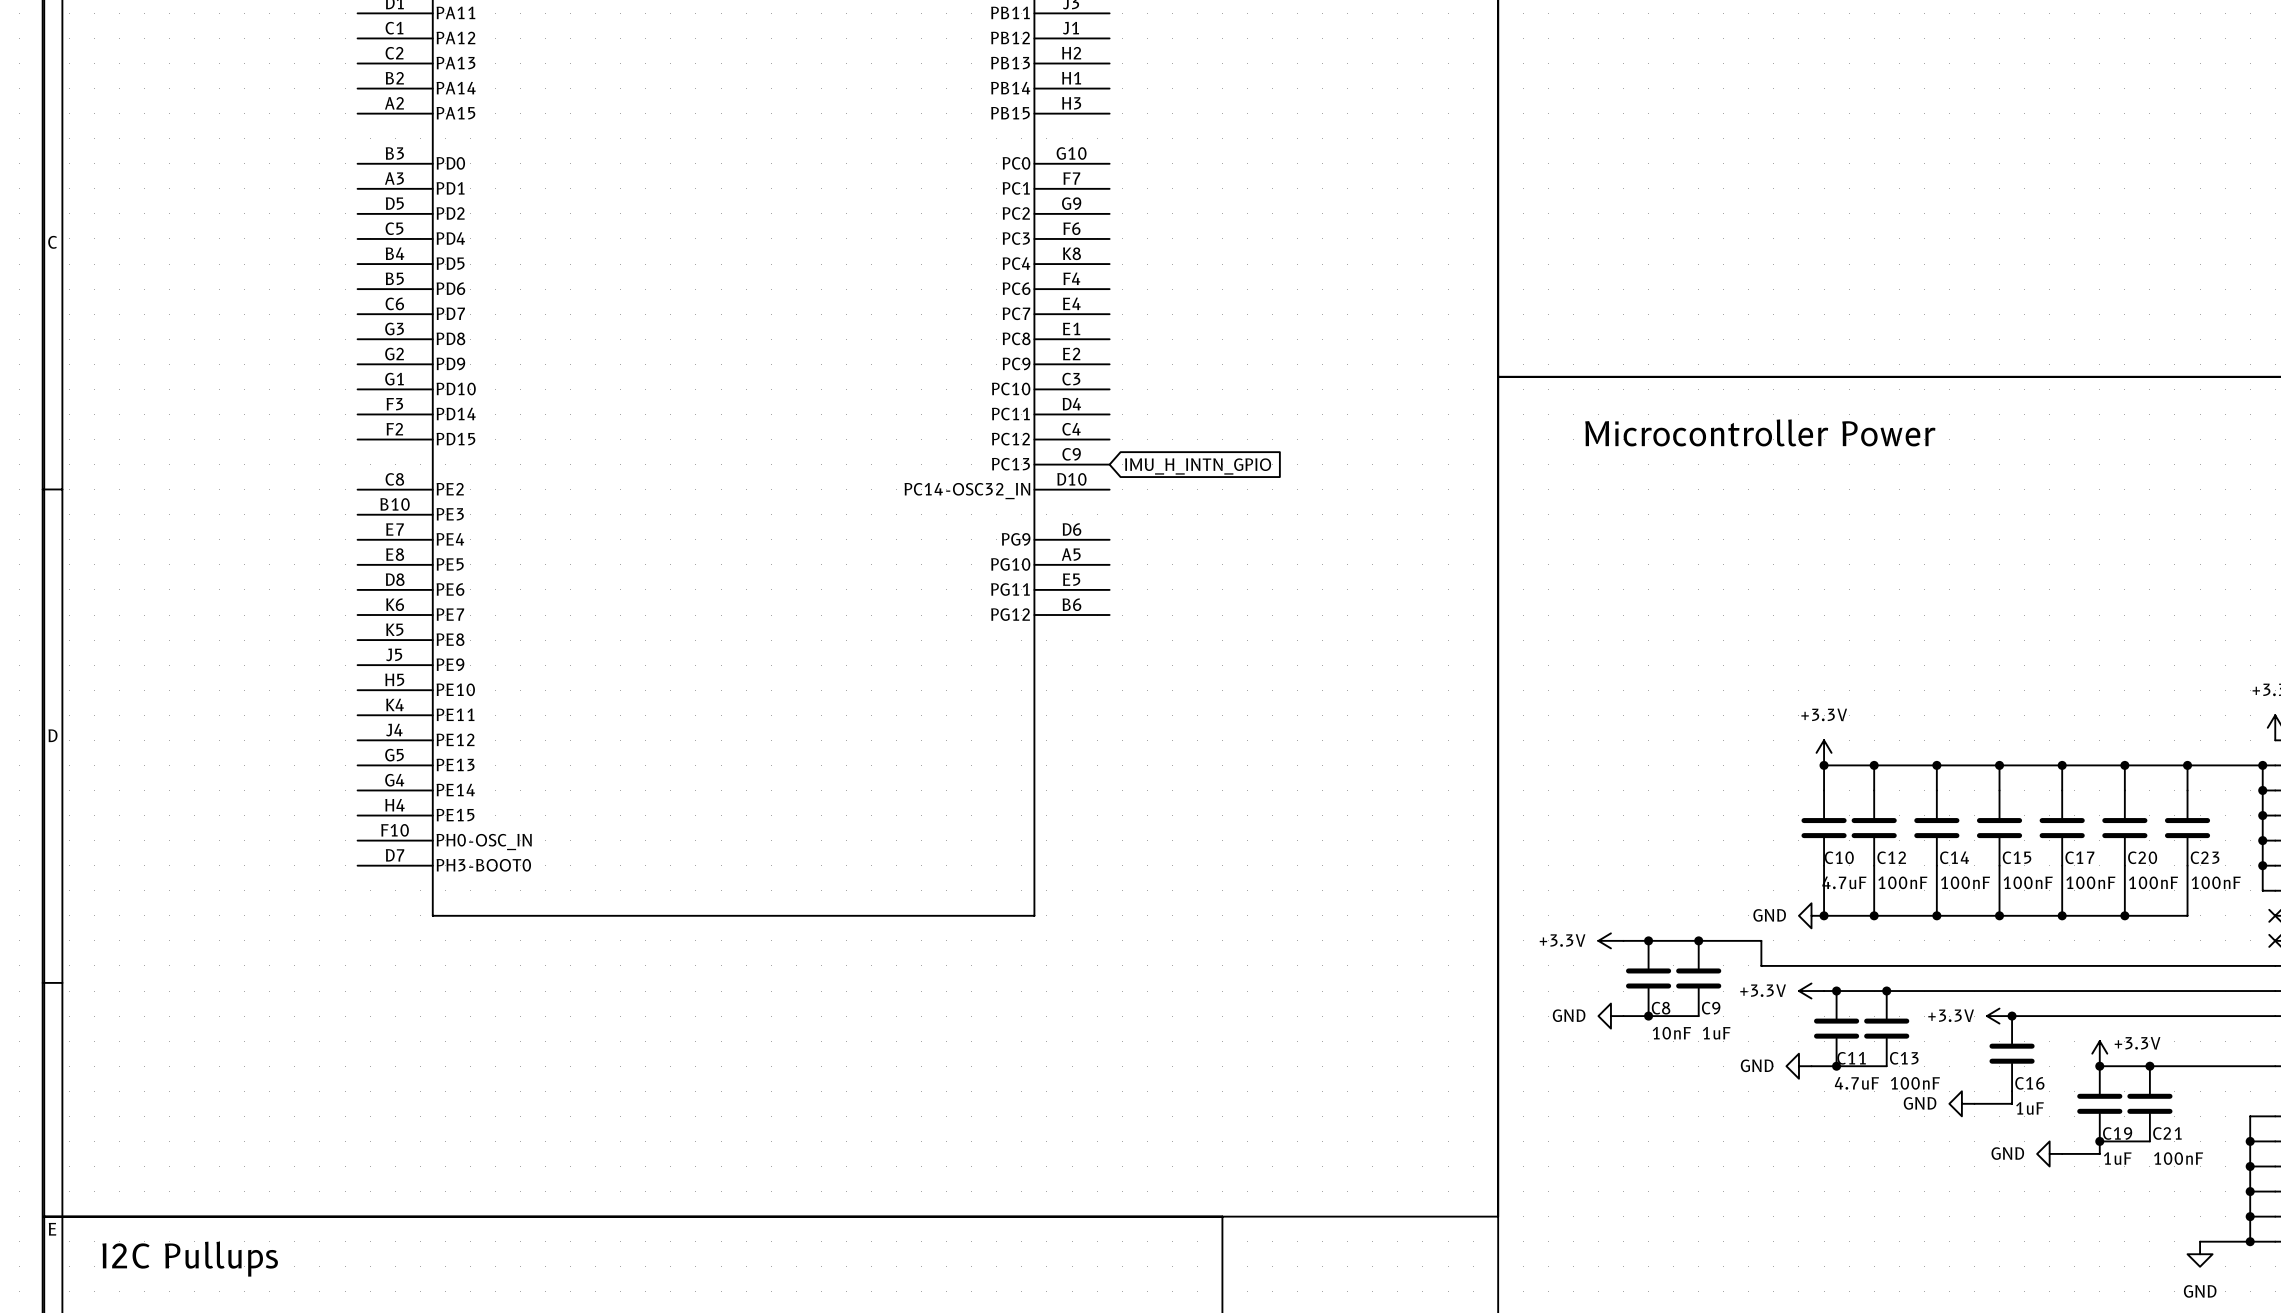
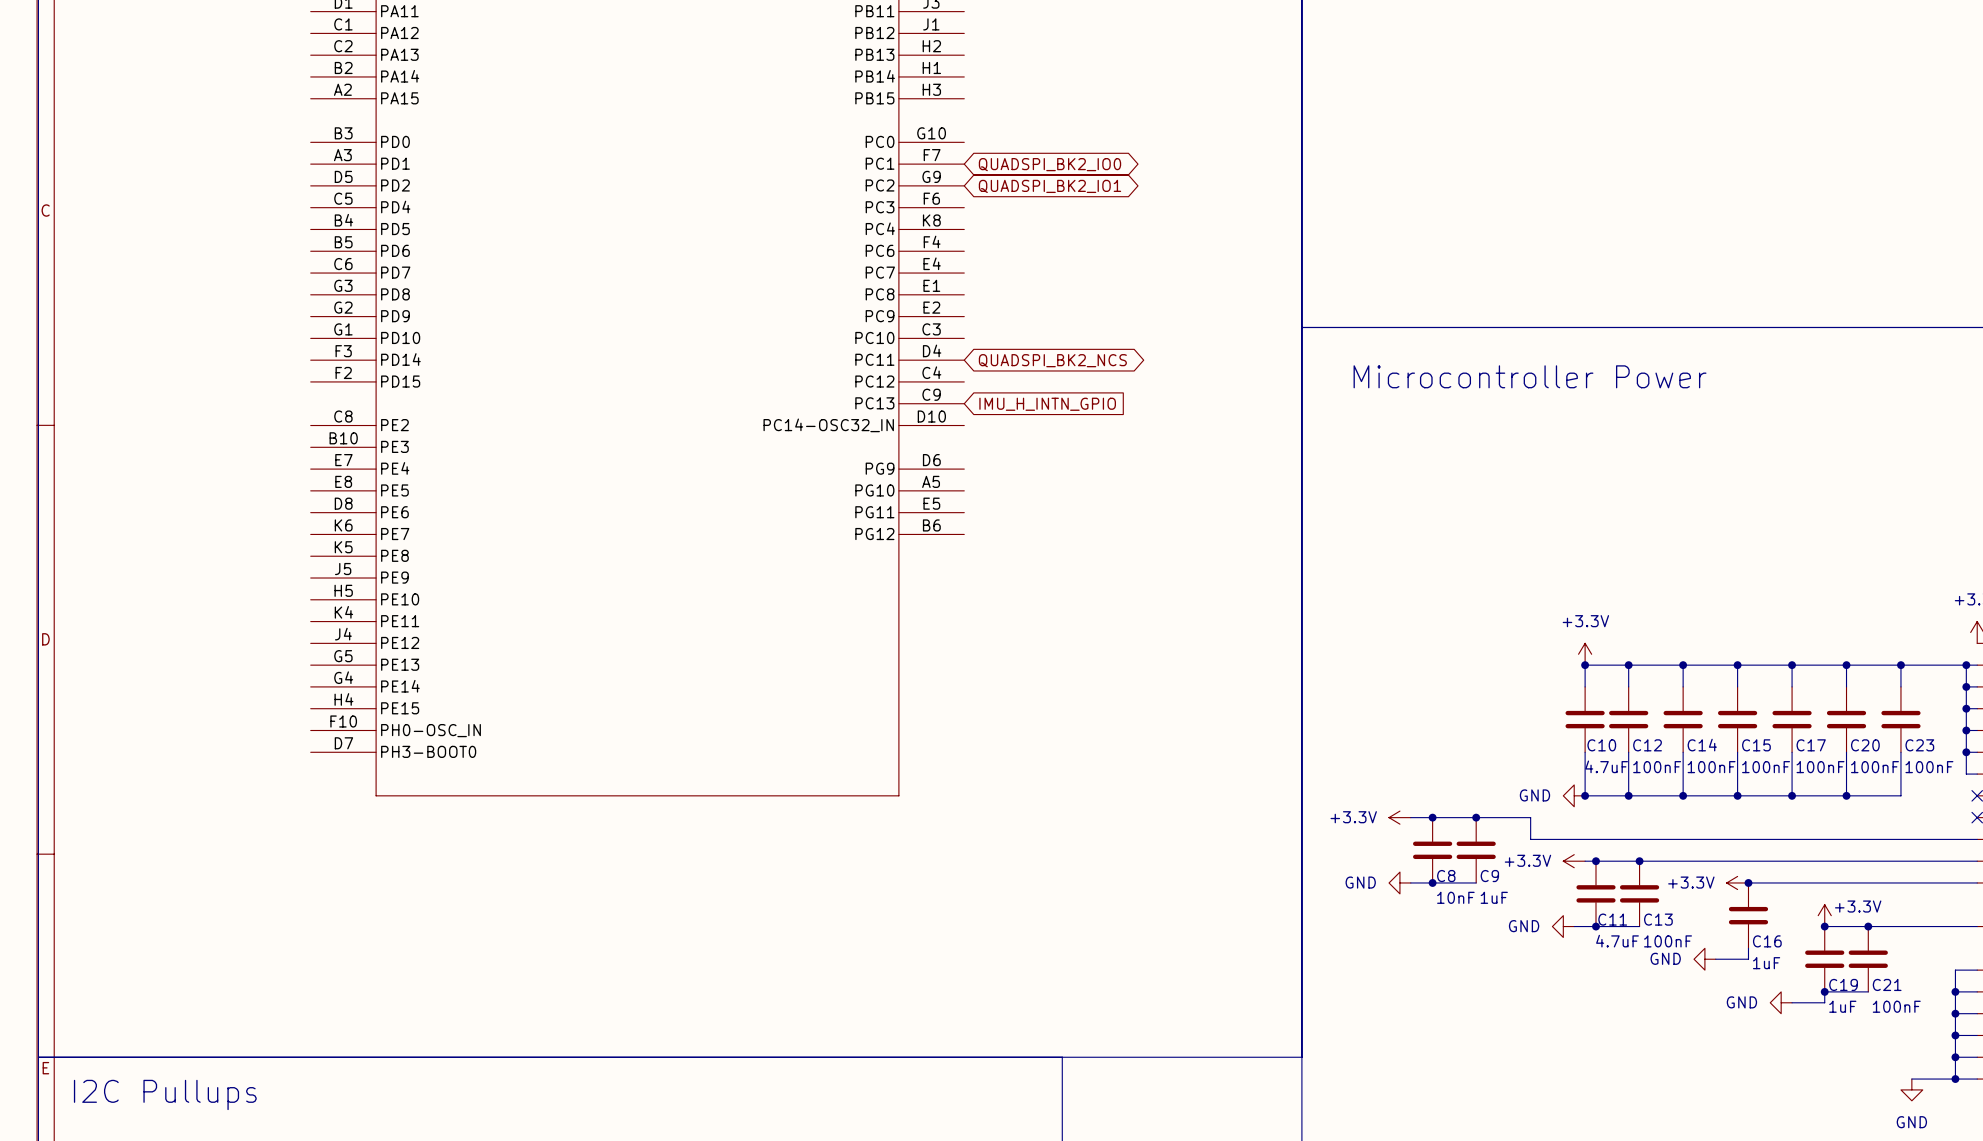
global label: none -> QUADSPI_BK2_IO0 (1049, 164)
global label: none -> QUADSPI_BK2_IO1 (1049, 186)
global label: none -> QUADSPI_BK2_NCS (1052, 360)

